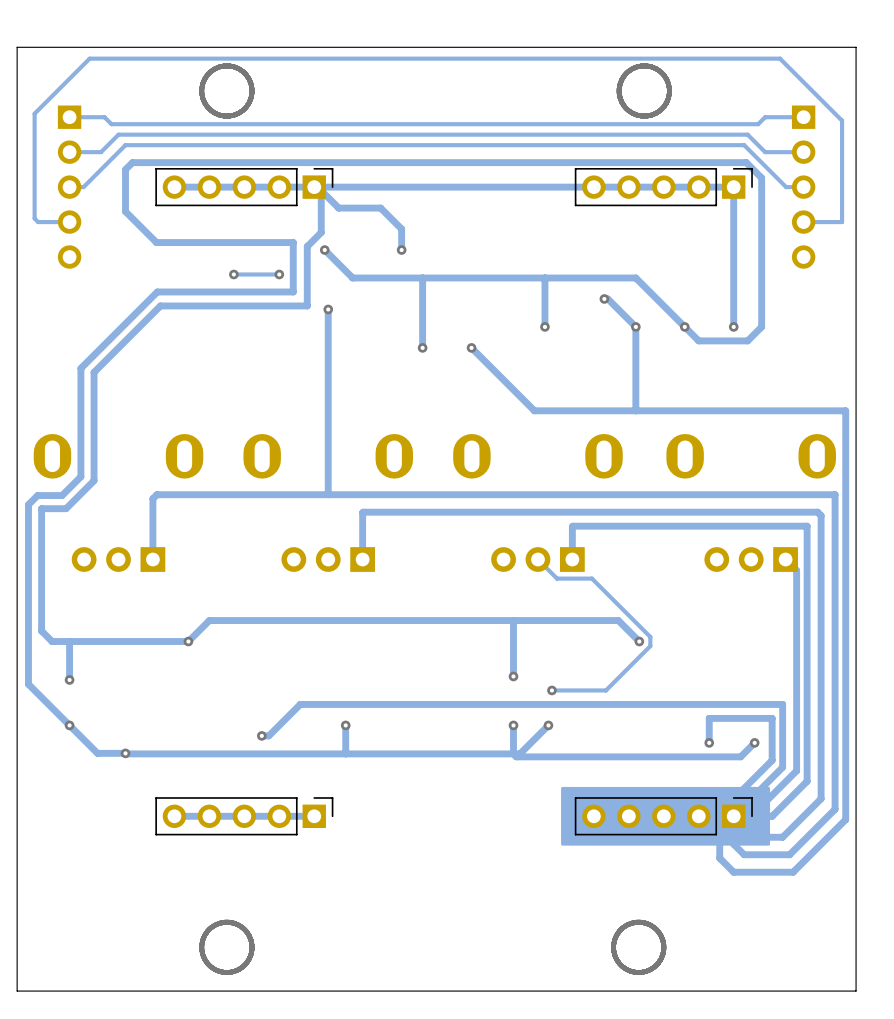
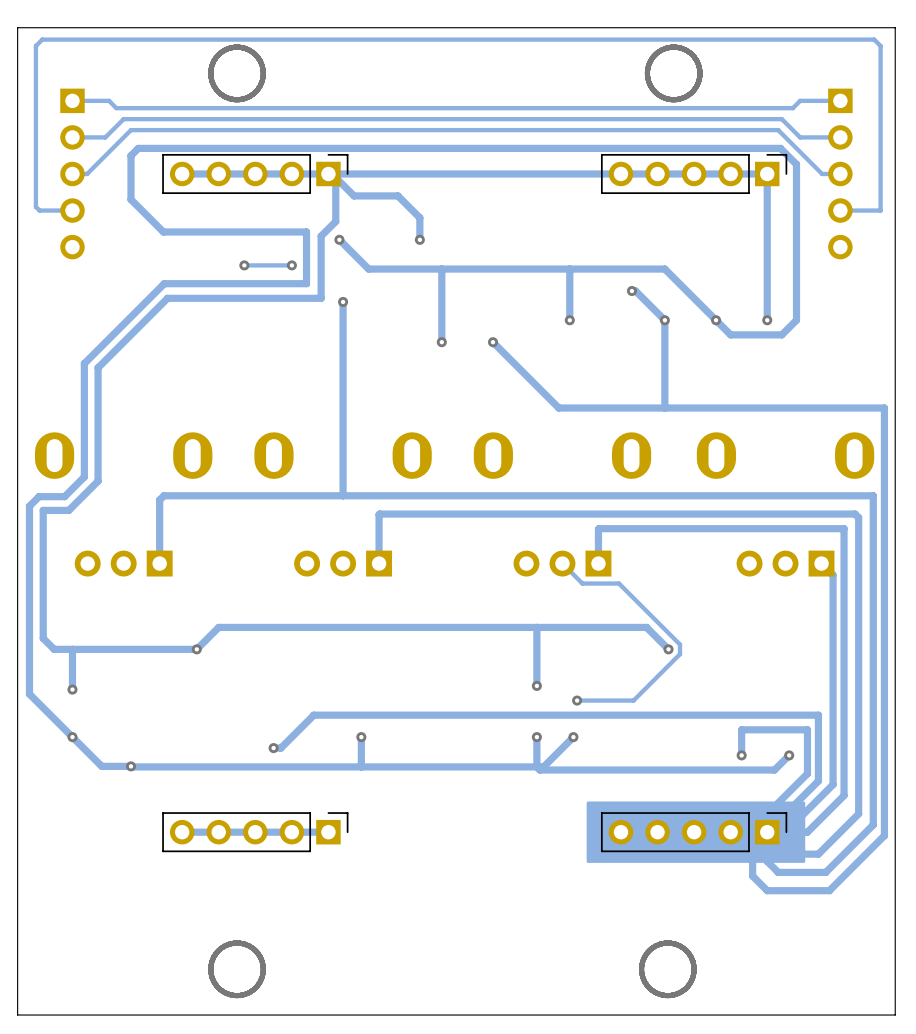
track: (89, 58) (34, 113) -> (93, 39) (42, 39) (35, 46) (35, 97)
track: (780, 58) (842, 120) -> (815, 39) (874, 39) (880, 46) (880, 104)

